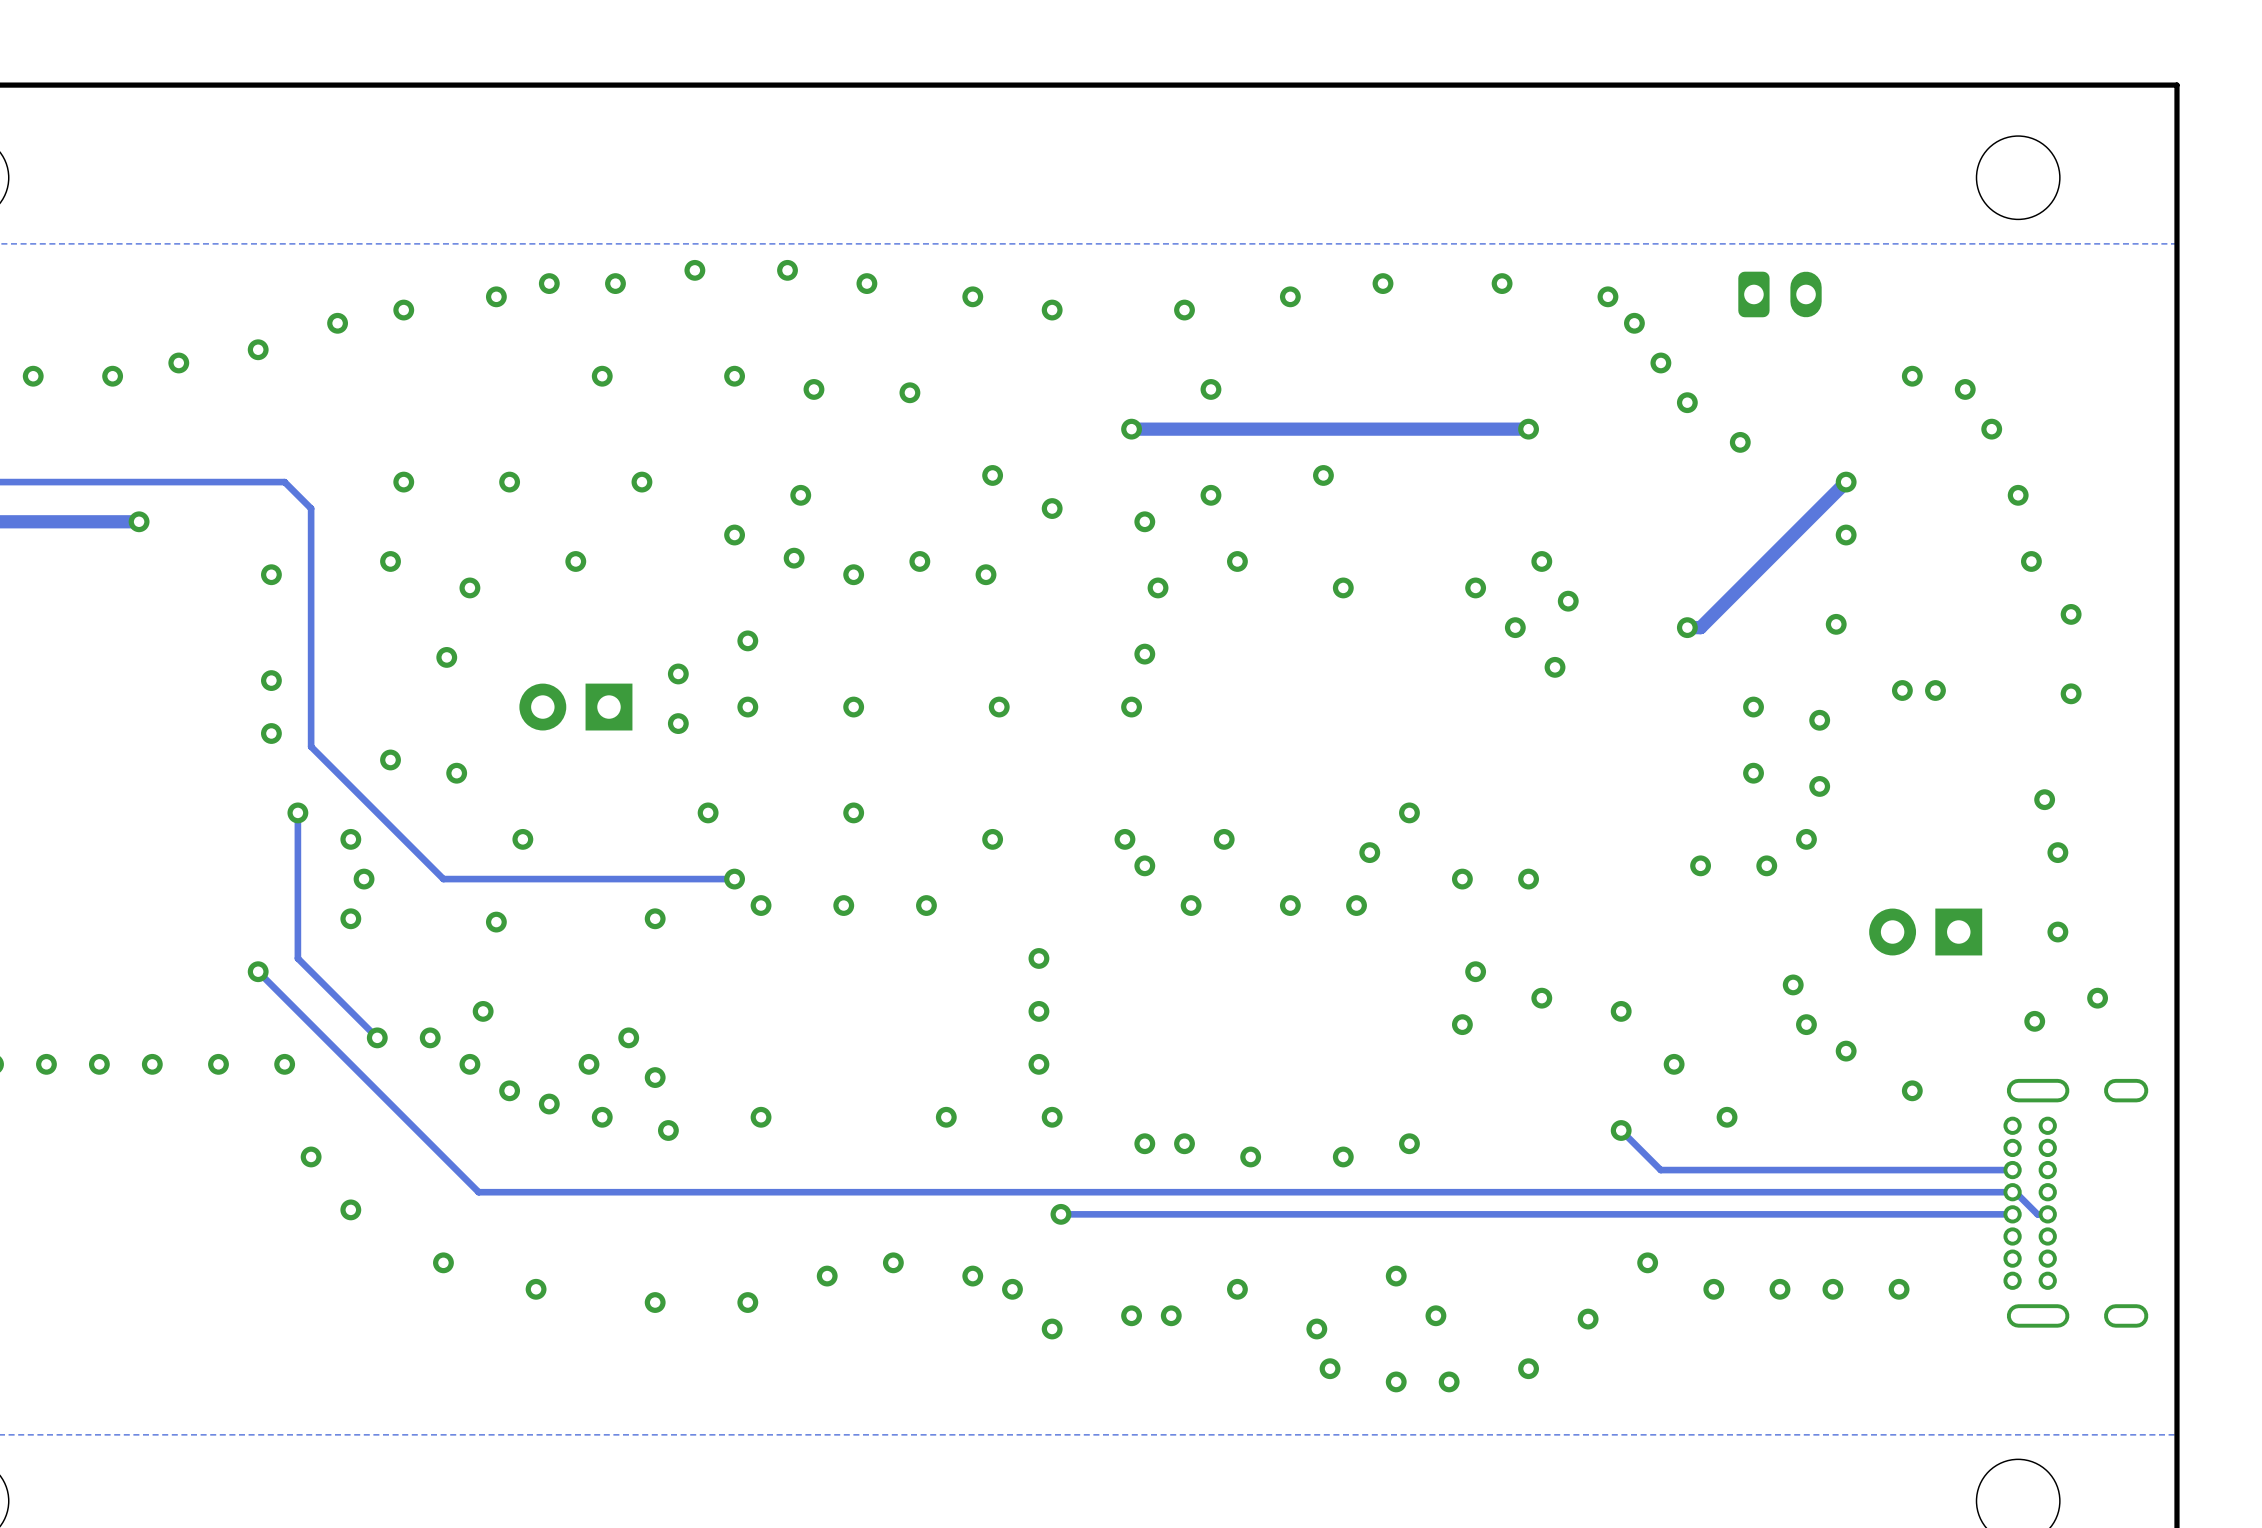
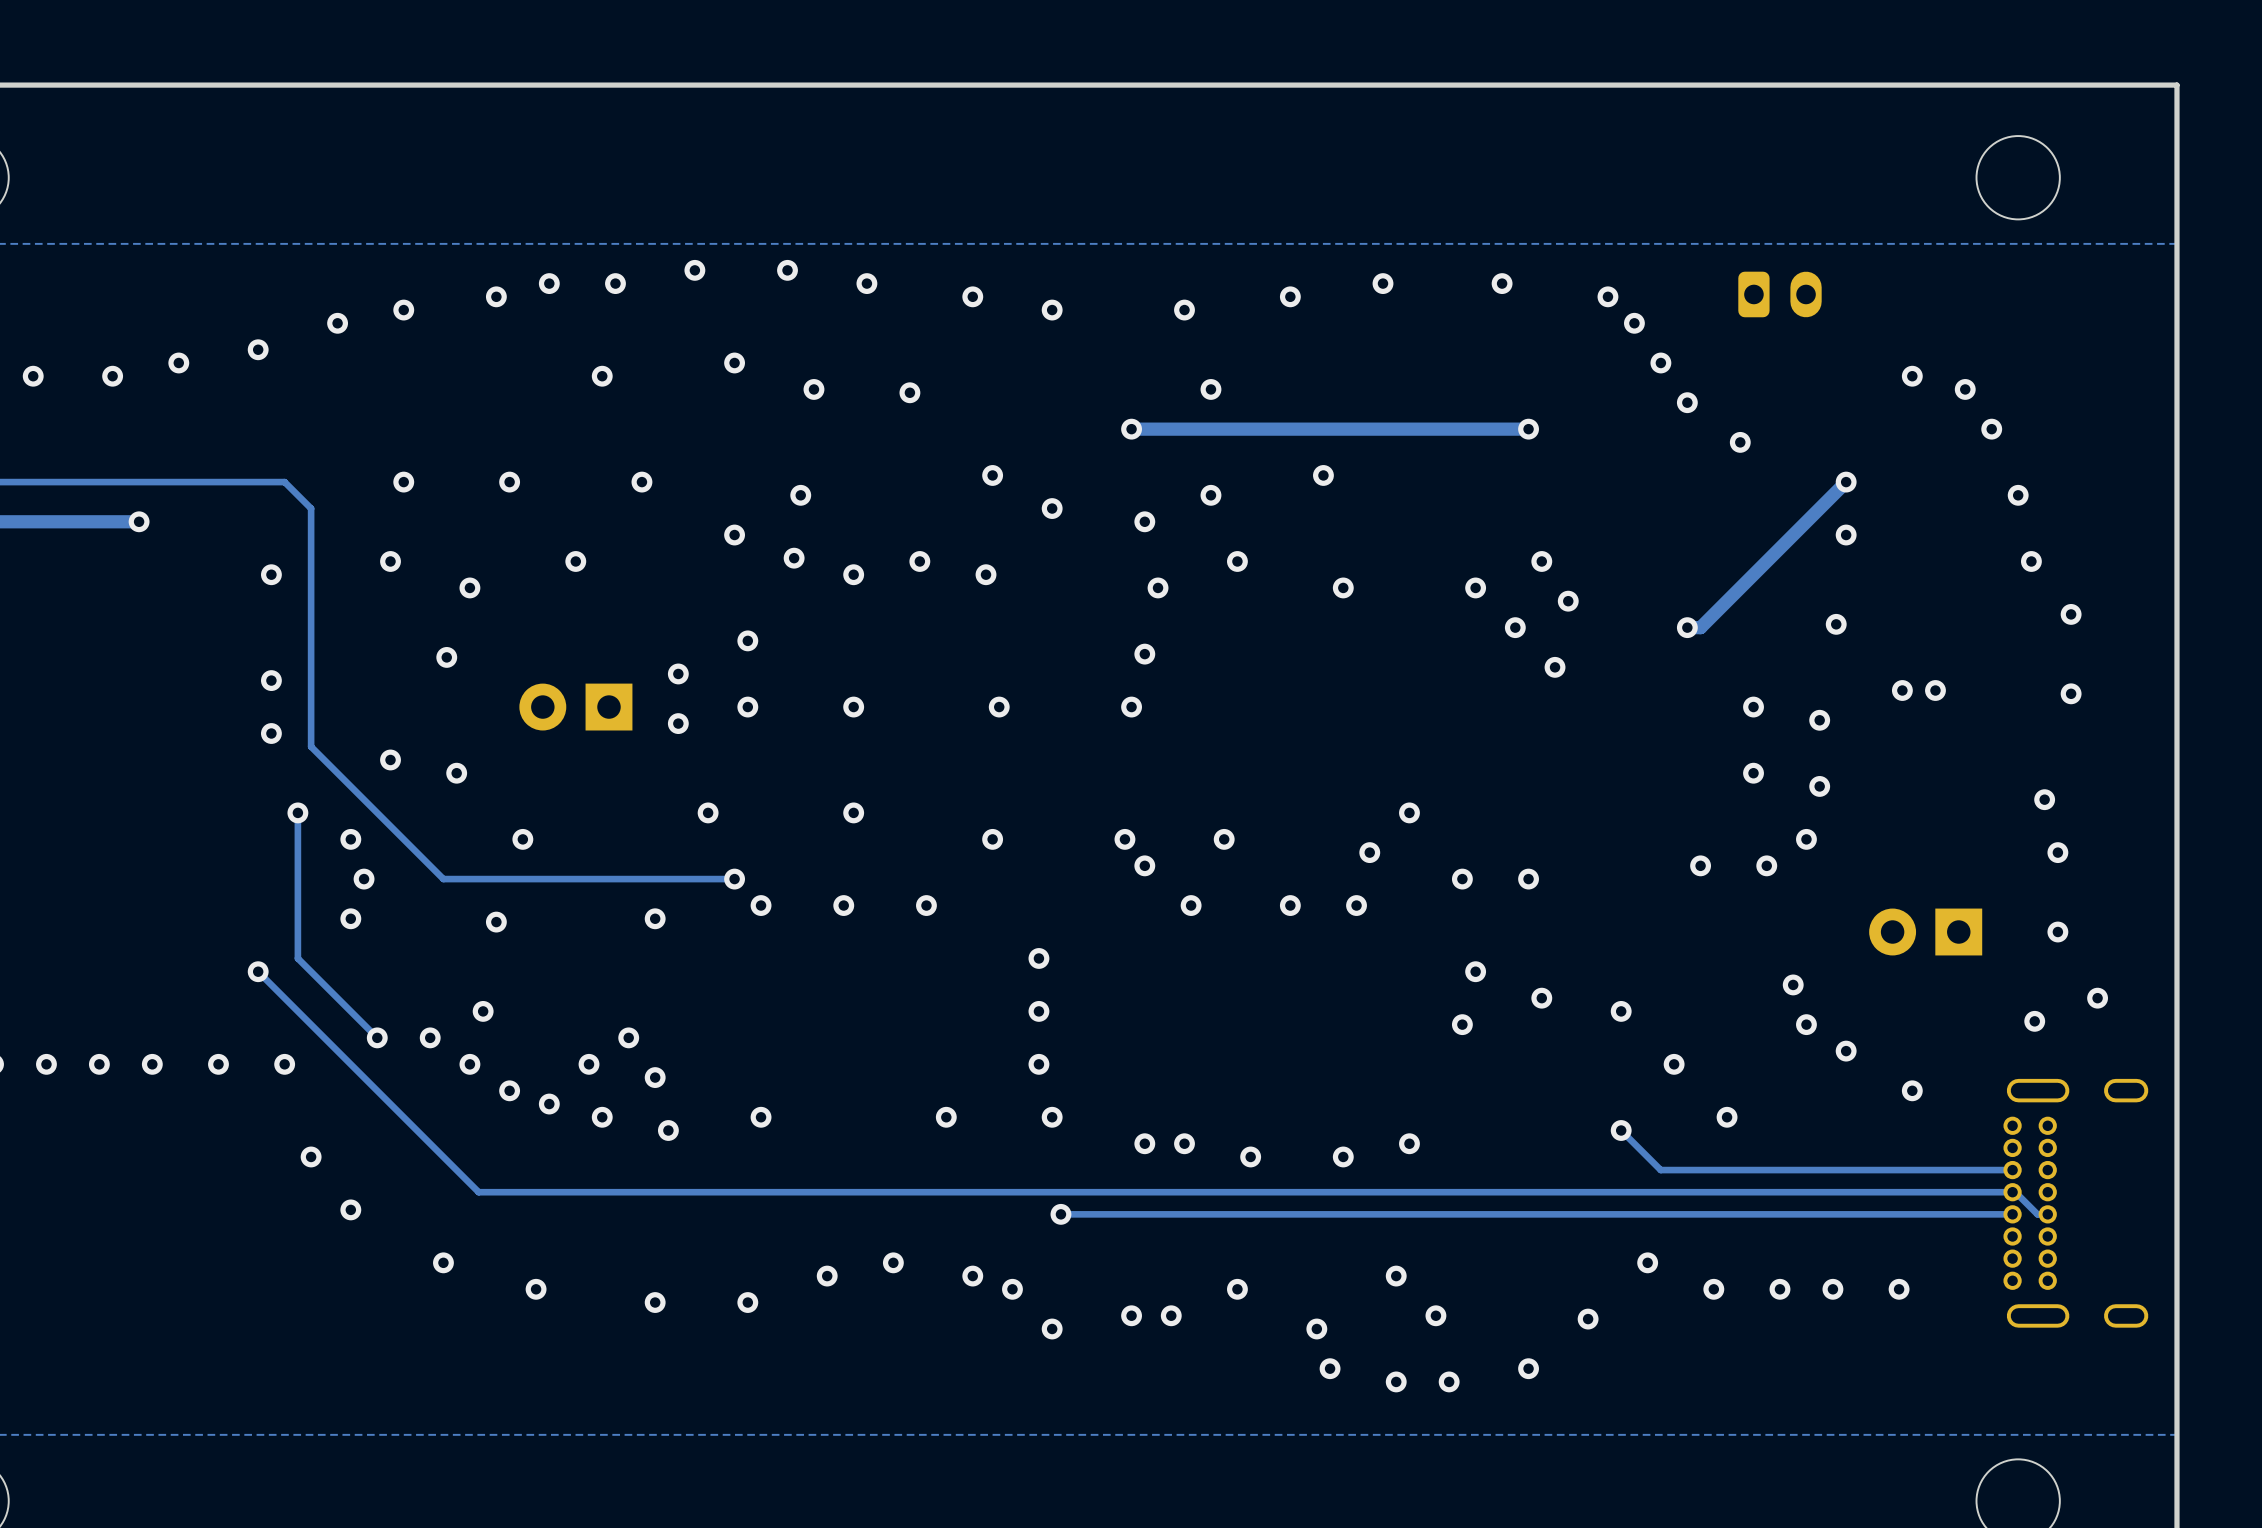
via position: (734, 376) -> (734, 362)

